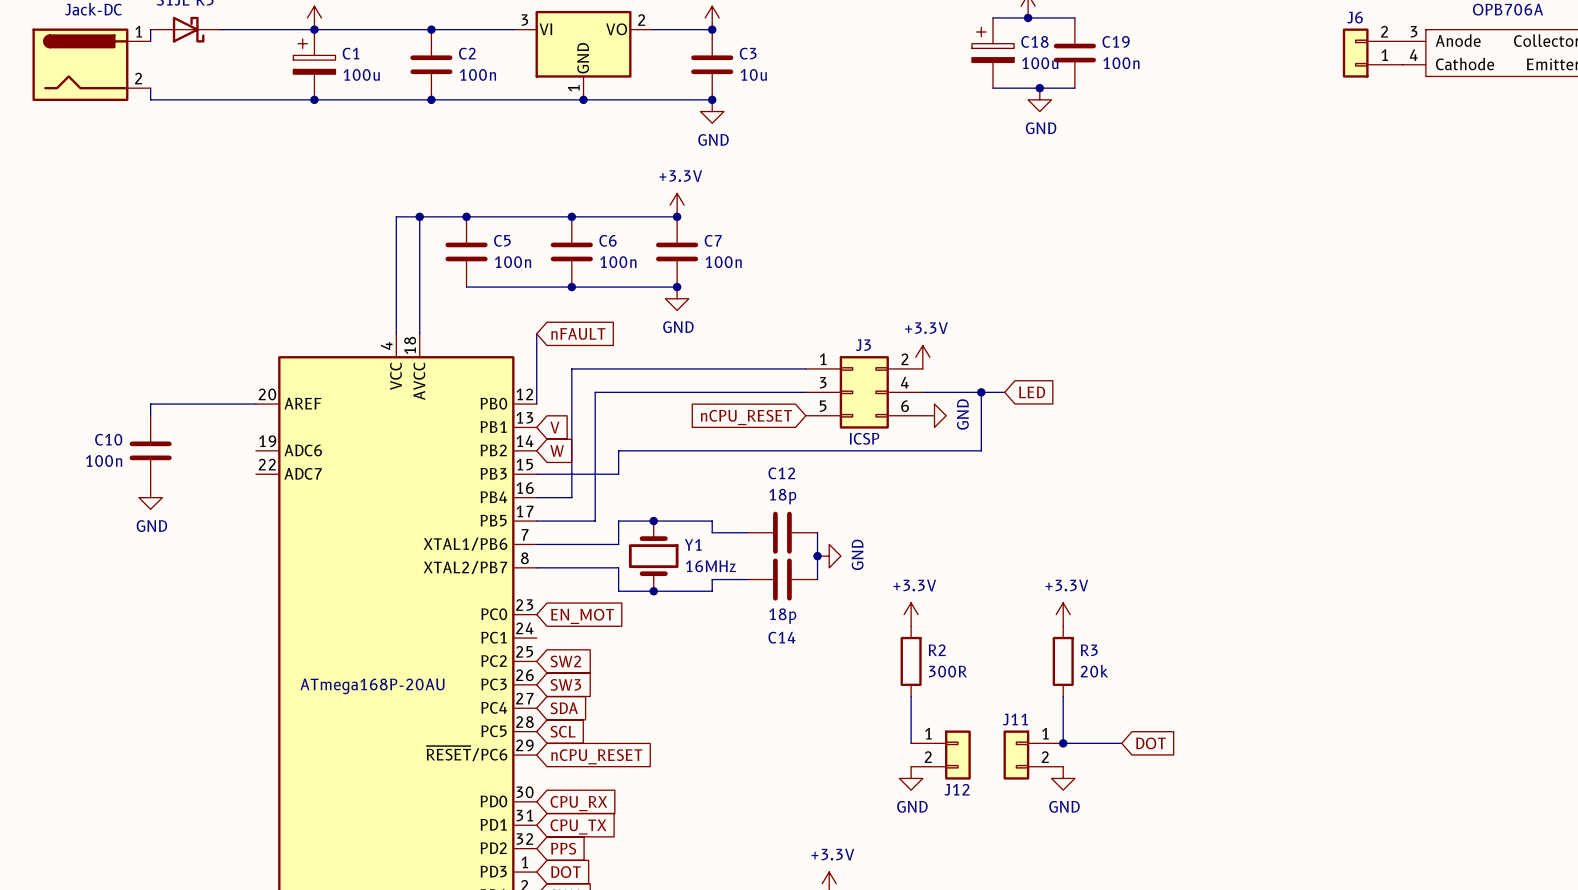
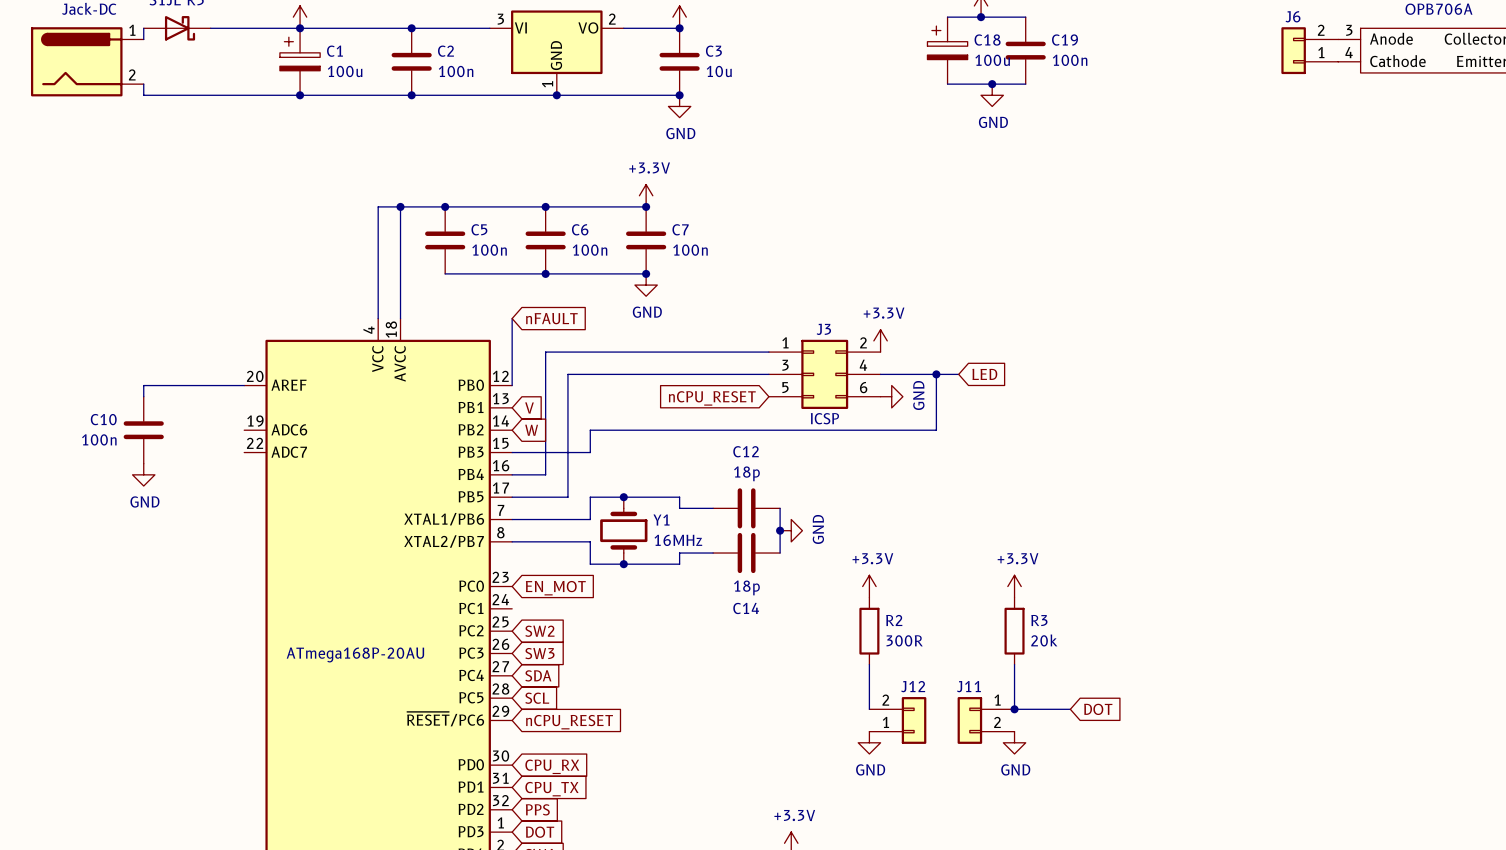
J12 flip: as is (957, 755) -> up-down (914, 720)

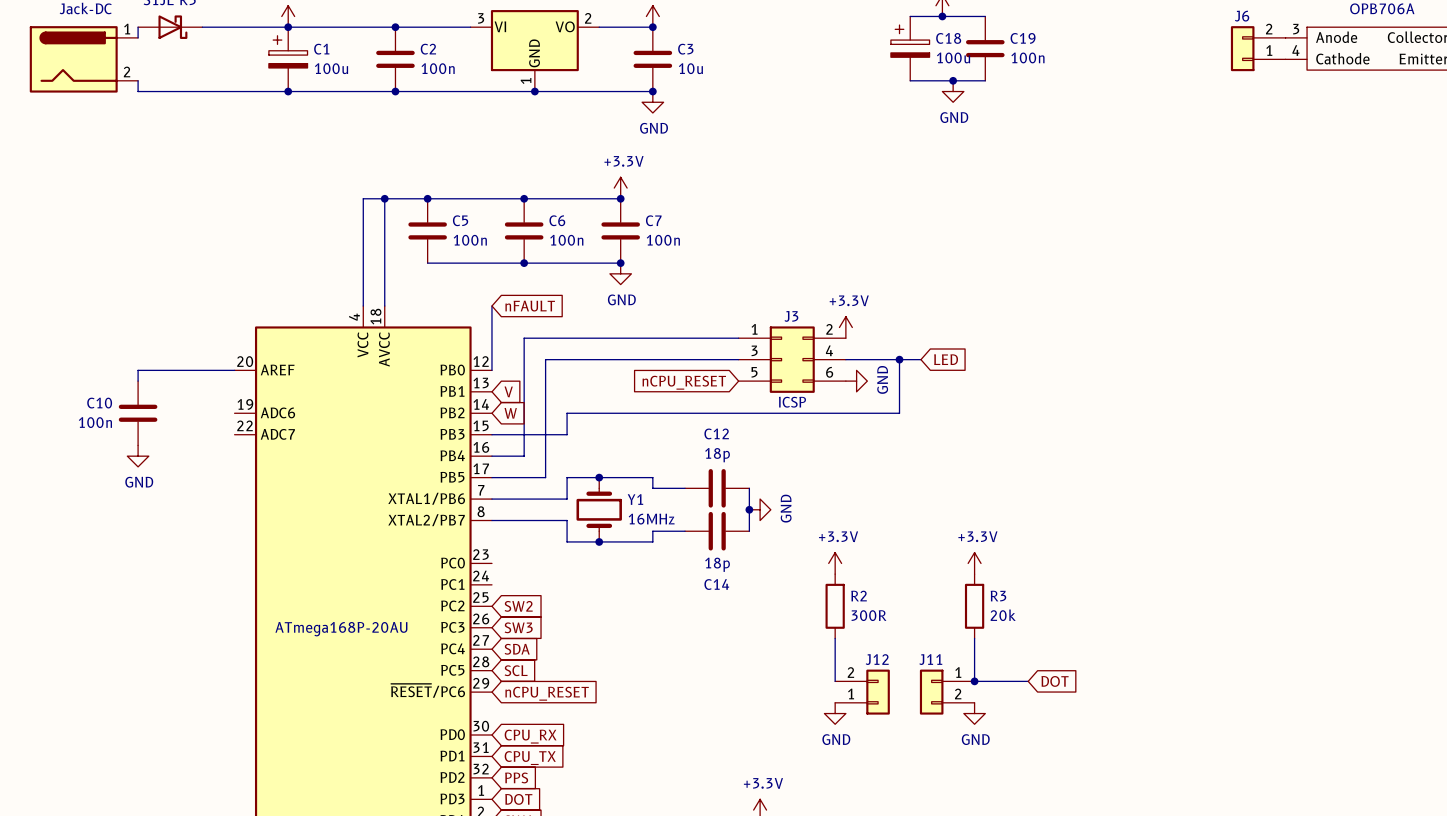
global label: EN_MOT (555, 588) -> none

